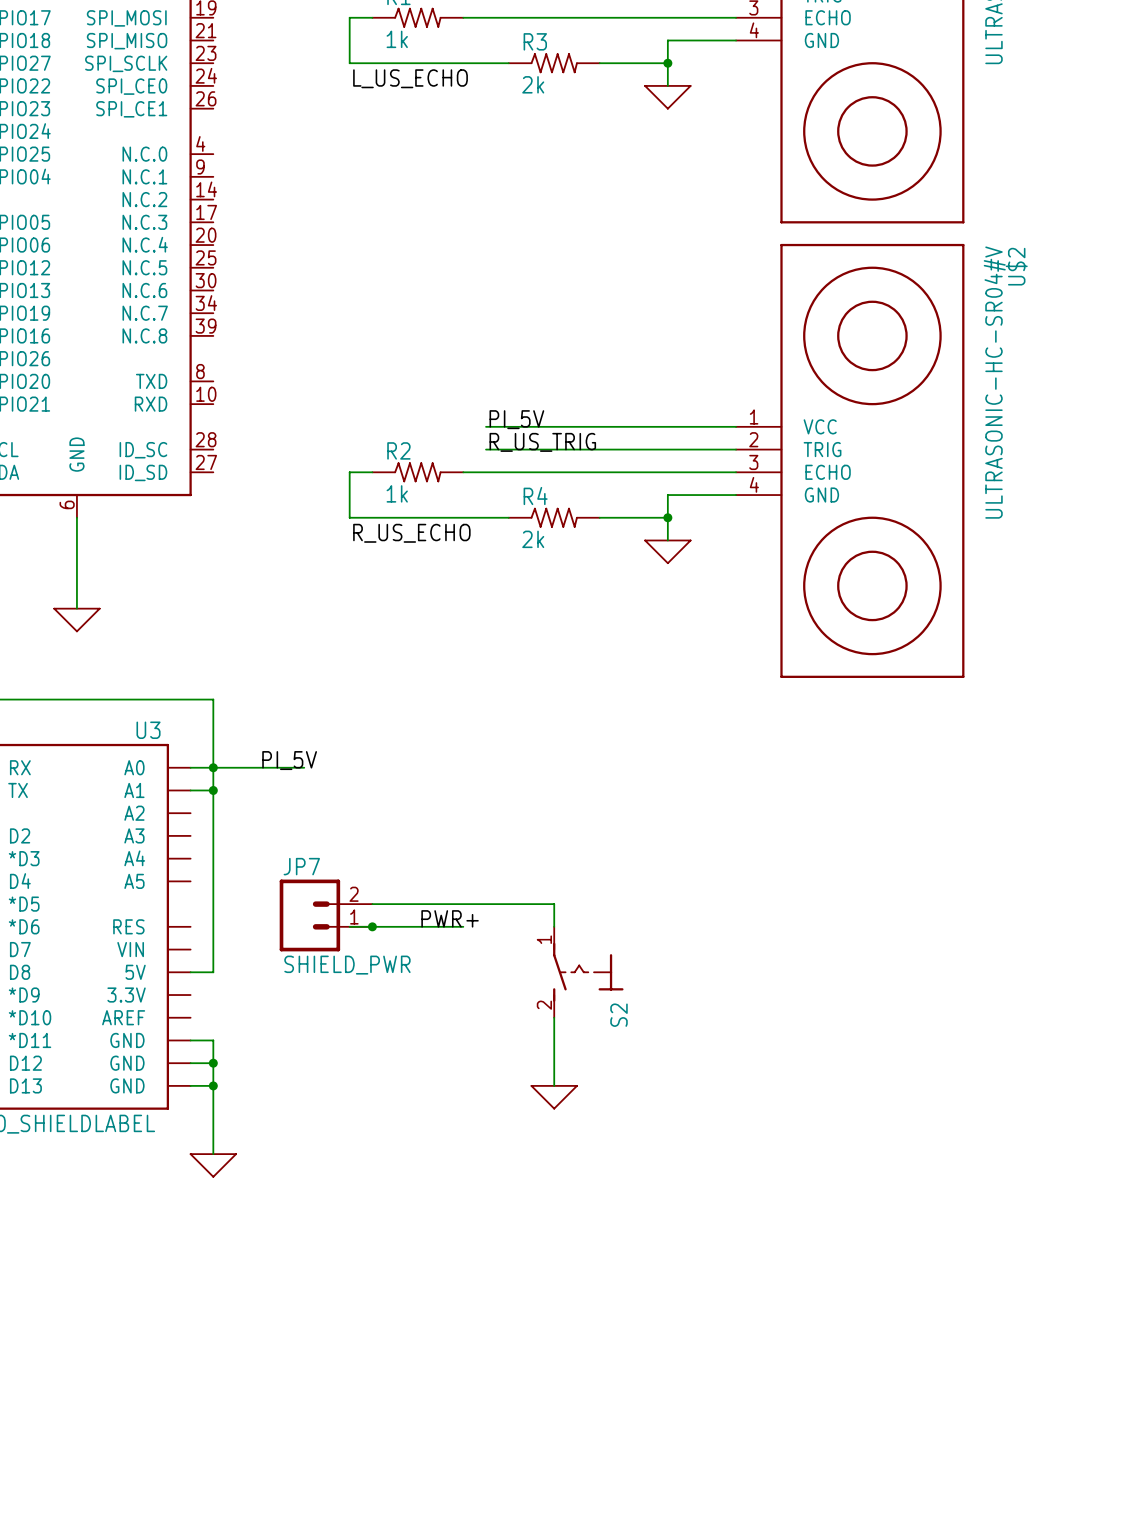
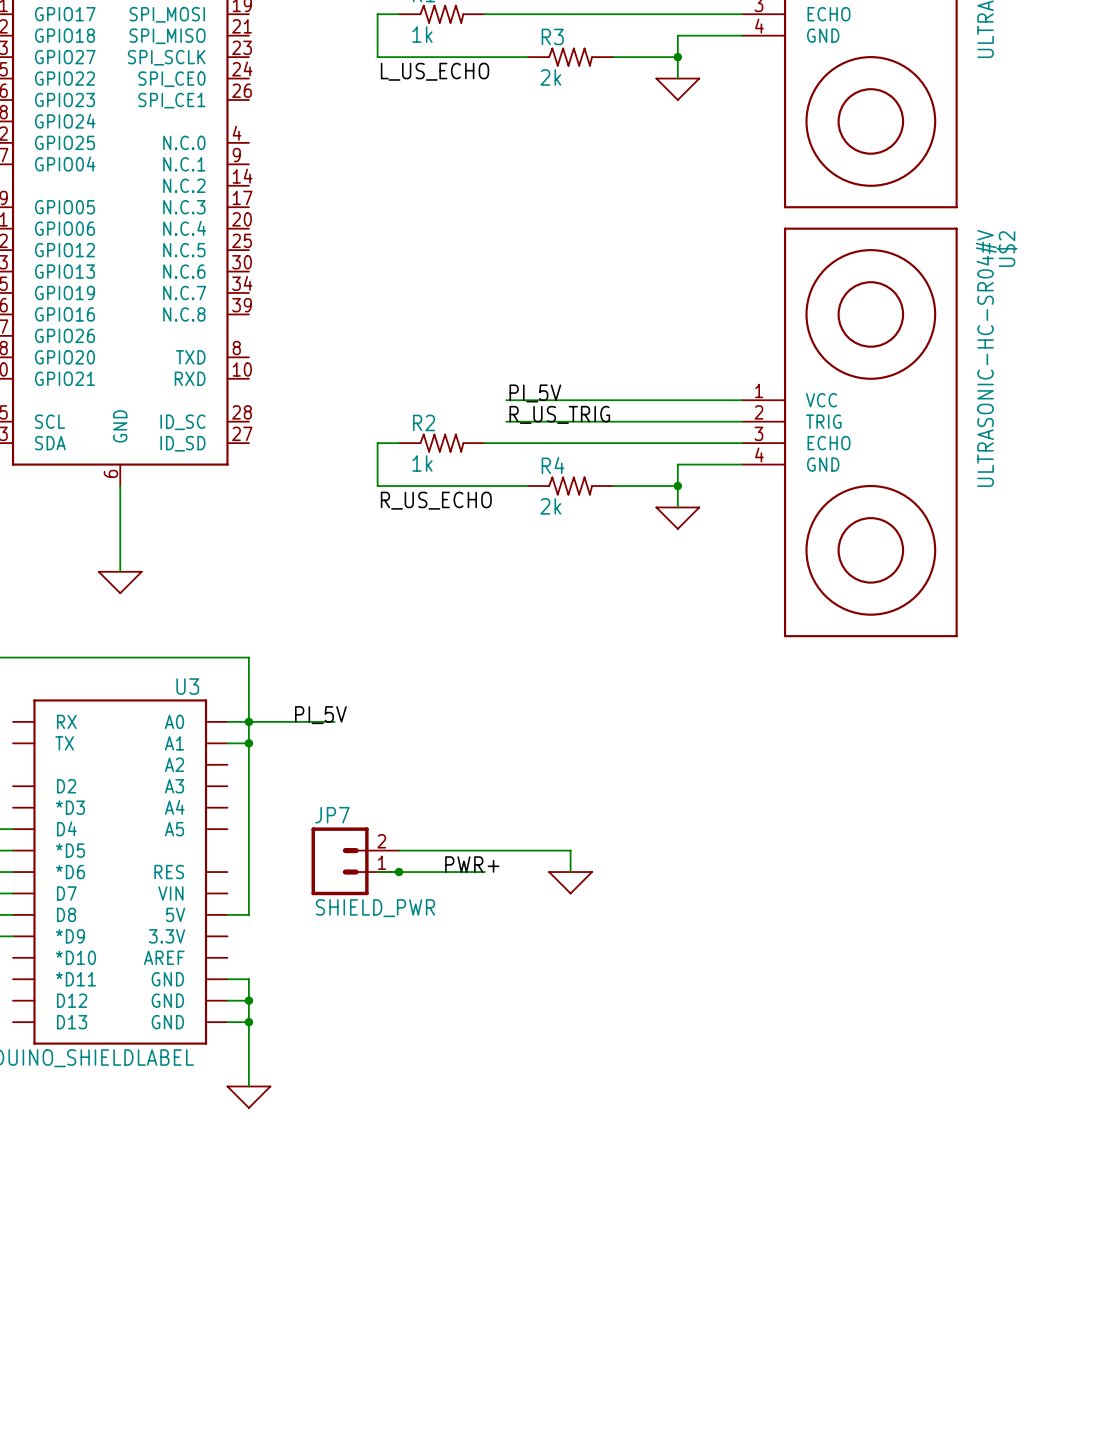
S2: (588, 972) -> none
wire: (554, 1017) (554, 1085) -> none
power symbol position: (554, 1097) -> (570, 882)

